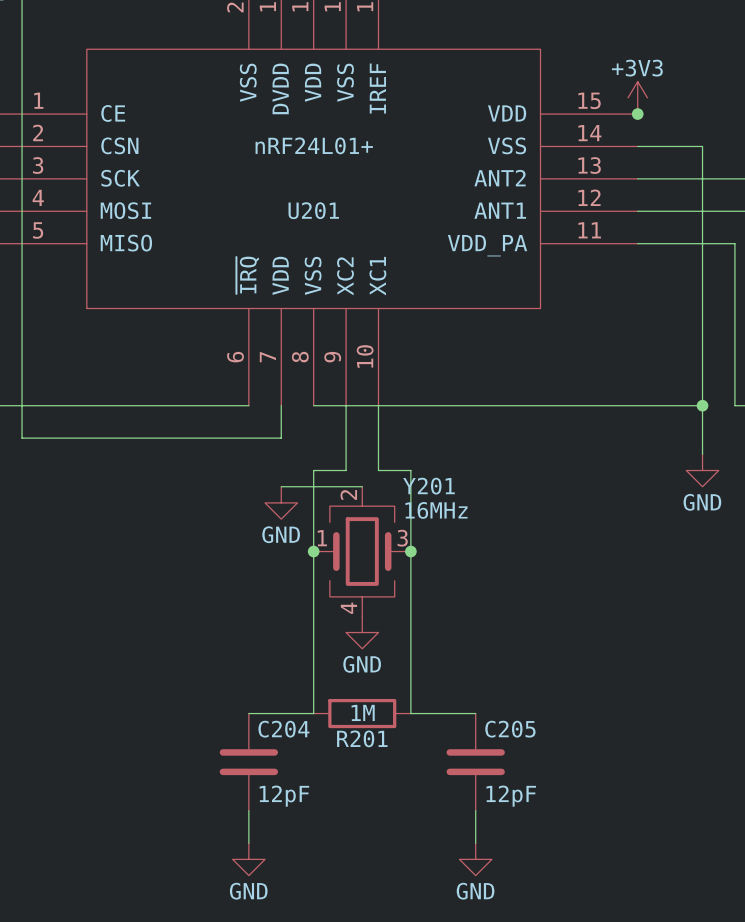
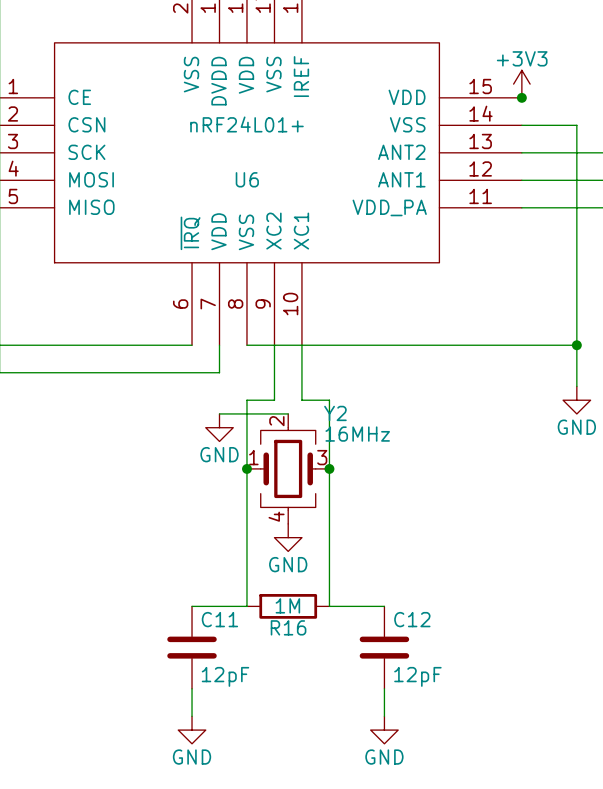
U201 name: U201 (313, 210) -> U6 (247, 179)
Y201 name: Y201 (428, 486) -> Y2 (335, 413)
C204 name: C204 (283, 729) -> C11 (219, 619)
C205 name: C205 (510, 729) -> C12 (412, 619)
R201 name: R201 (362, 738) -> R16 (288, 627)

